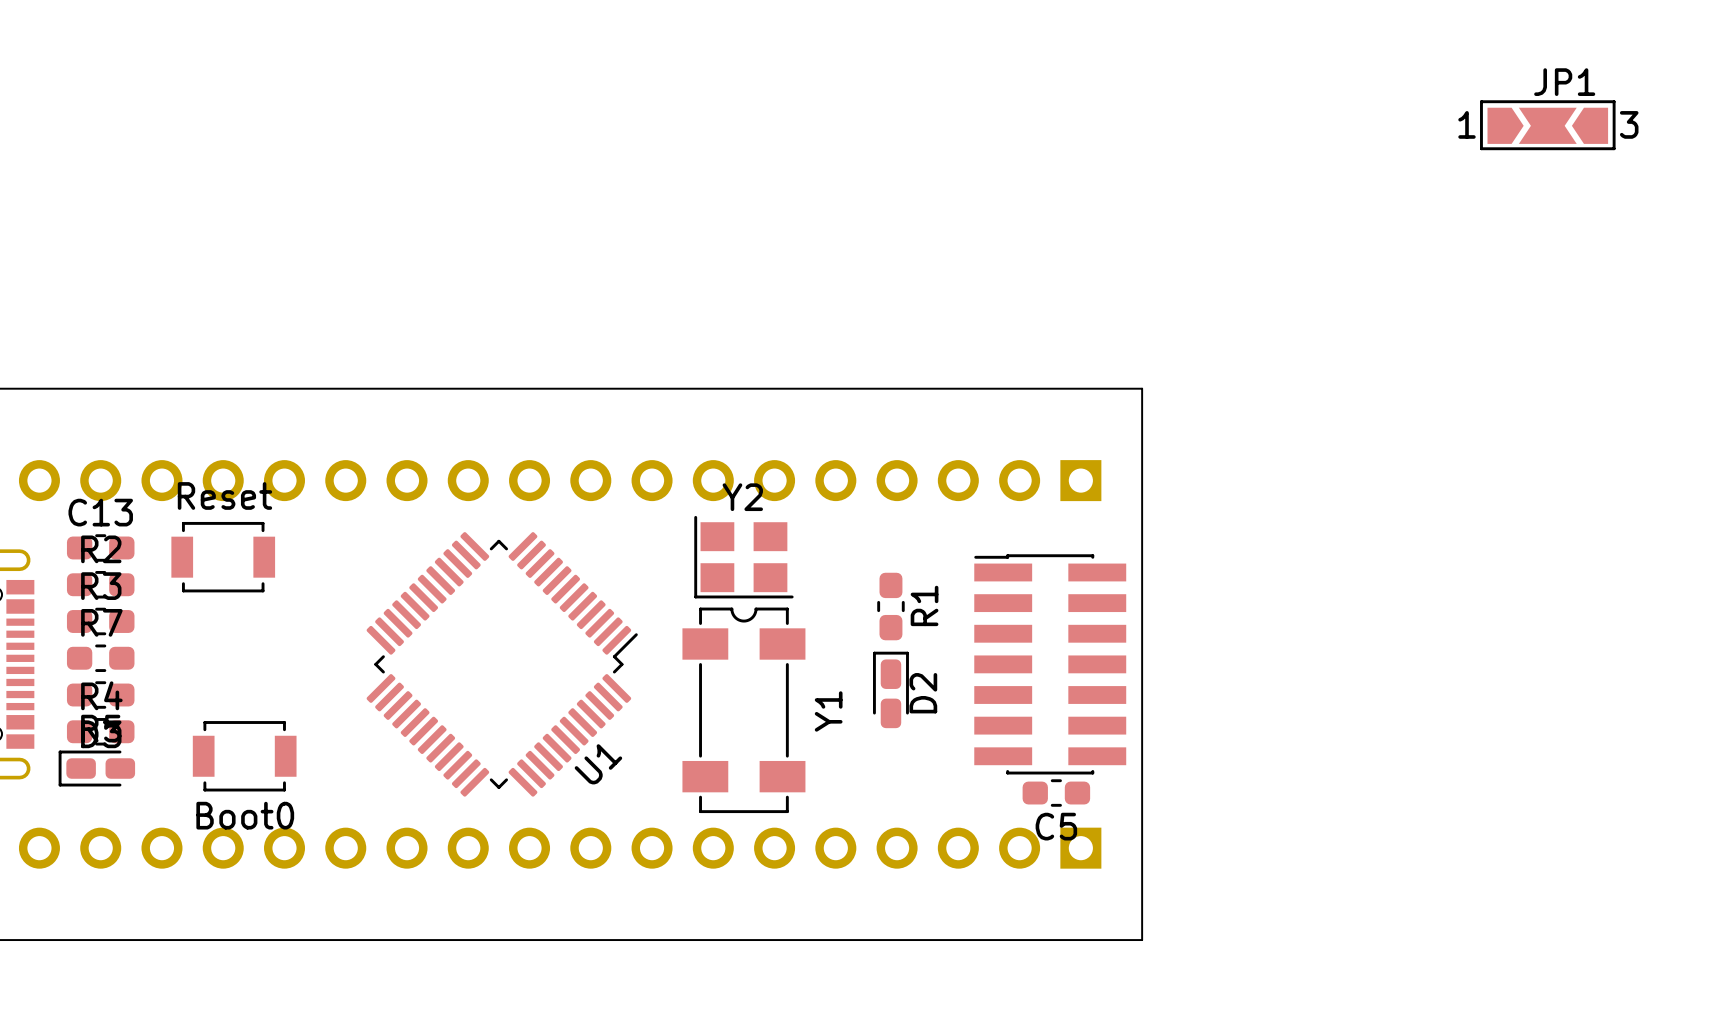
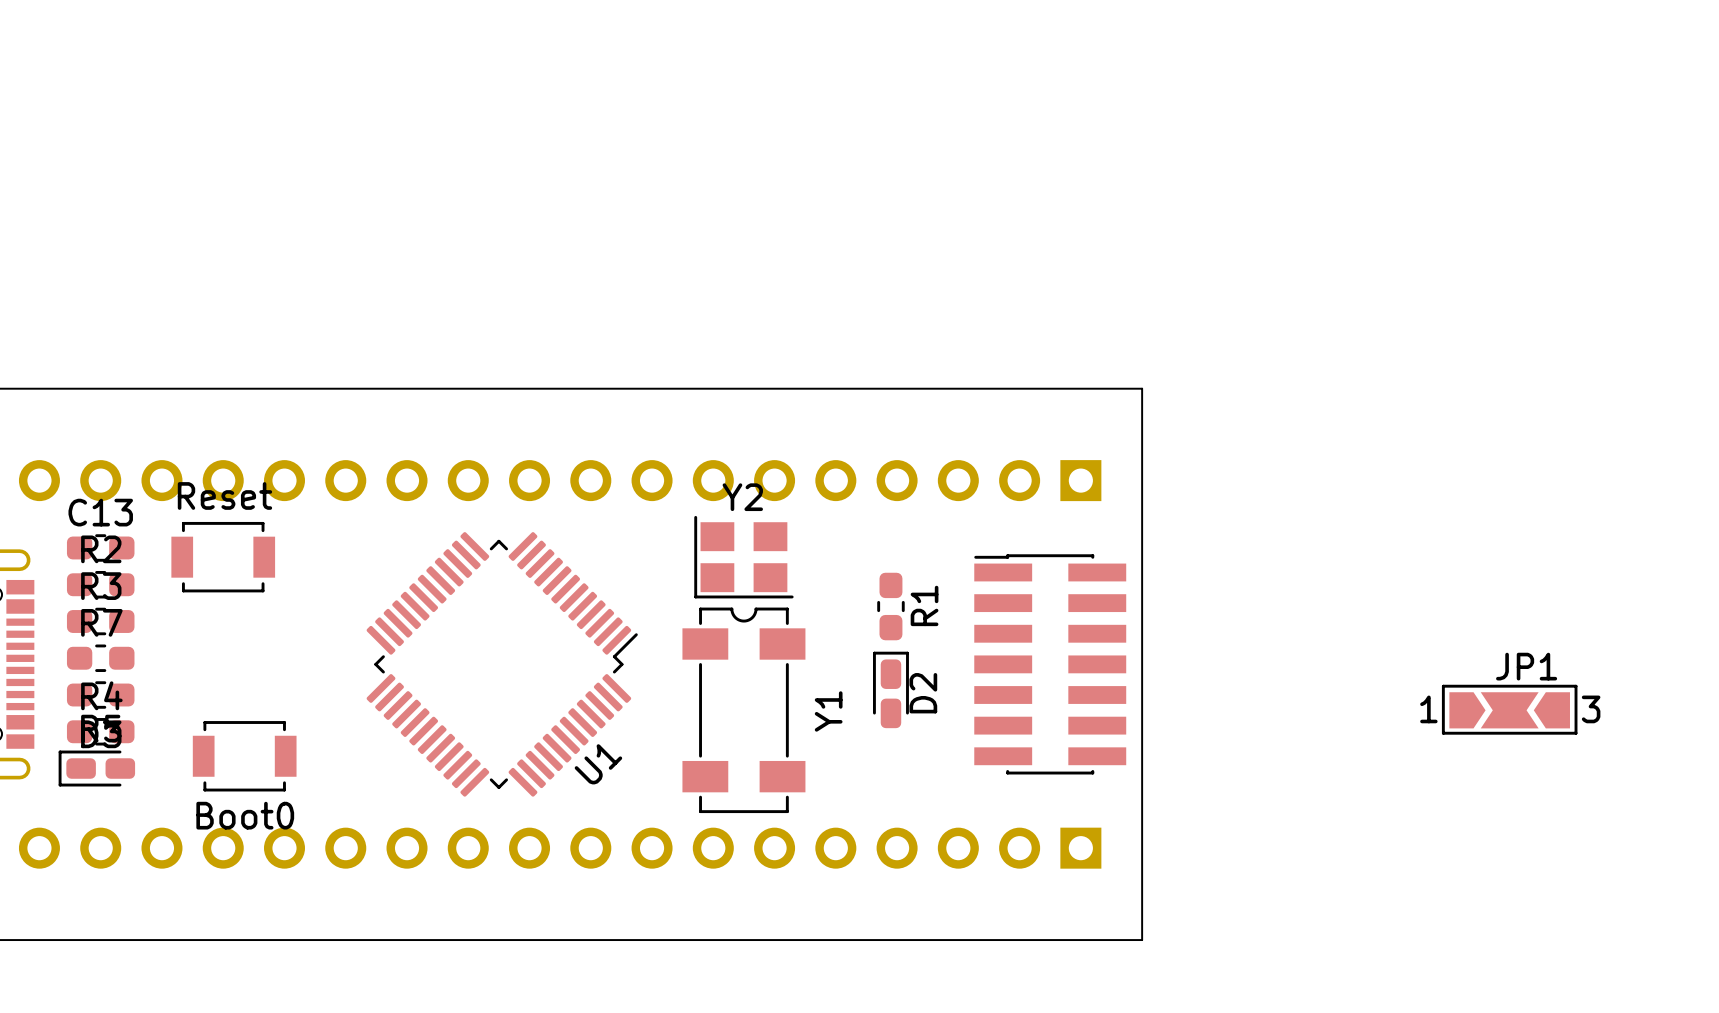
JP1 position: (1547, 125) -> (1509, 709)
C5: (1056, 793) -> none

